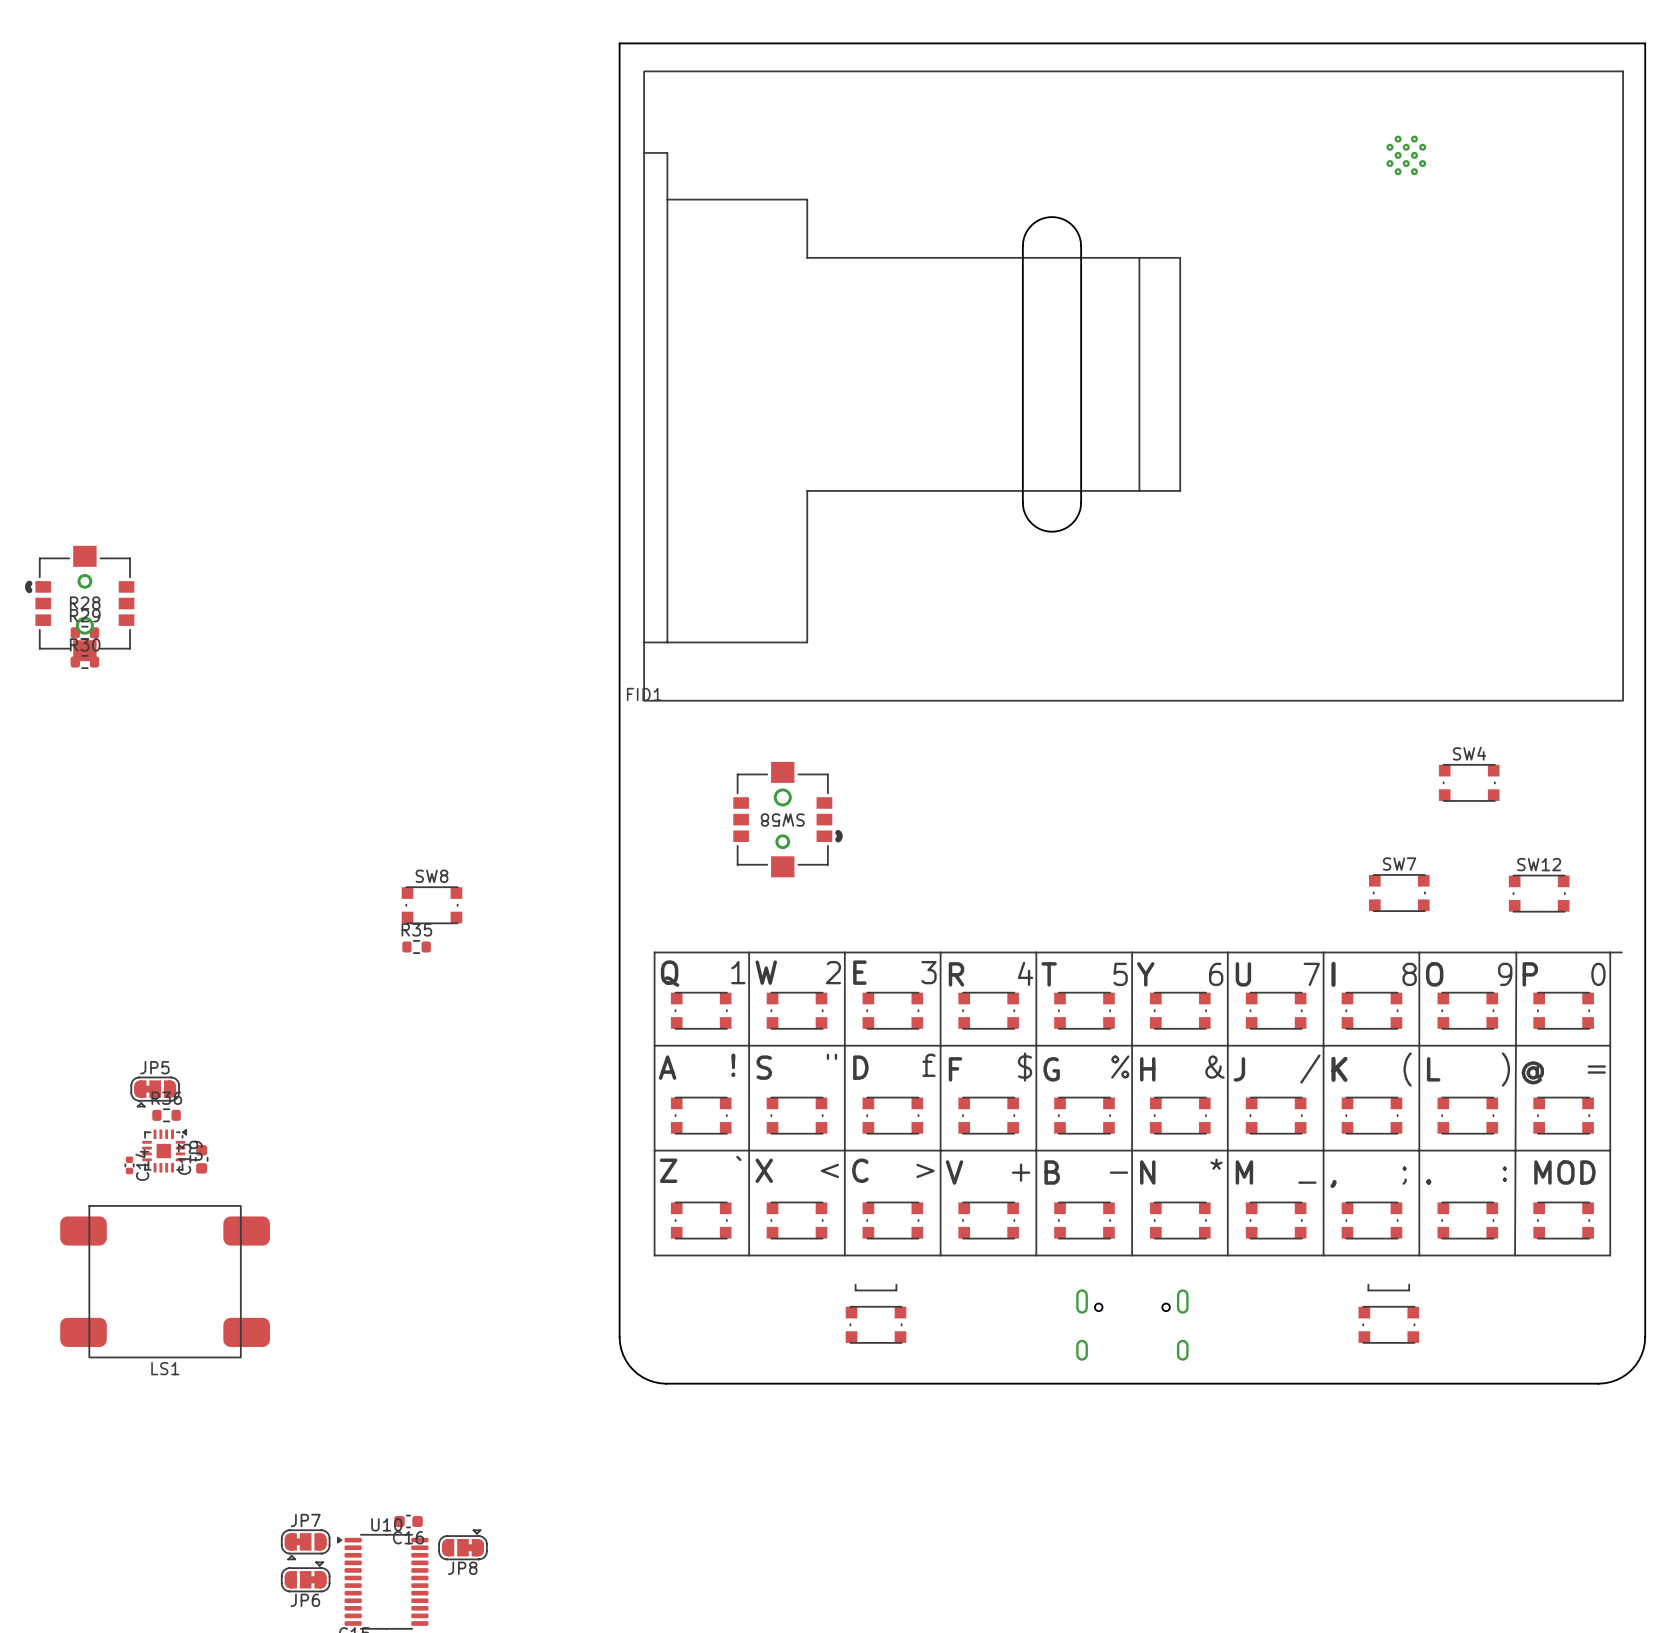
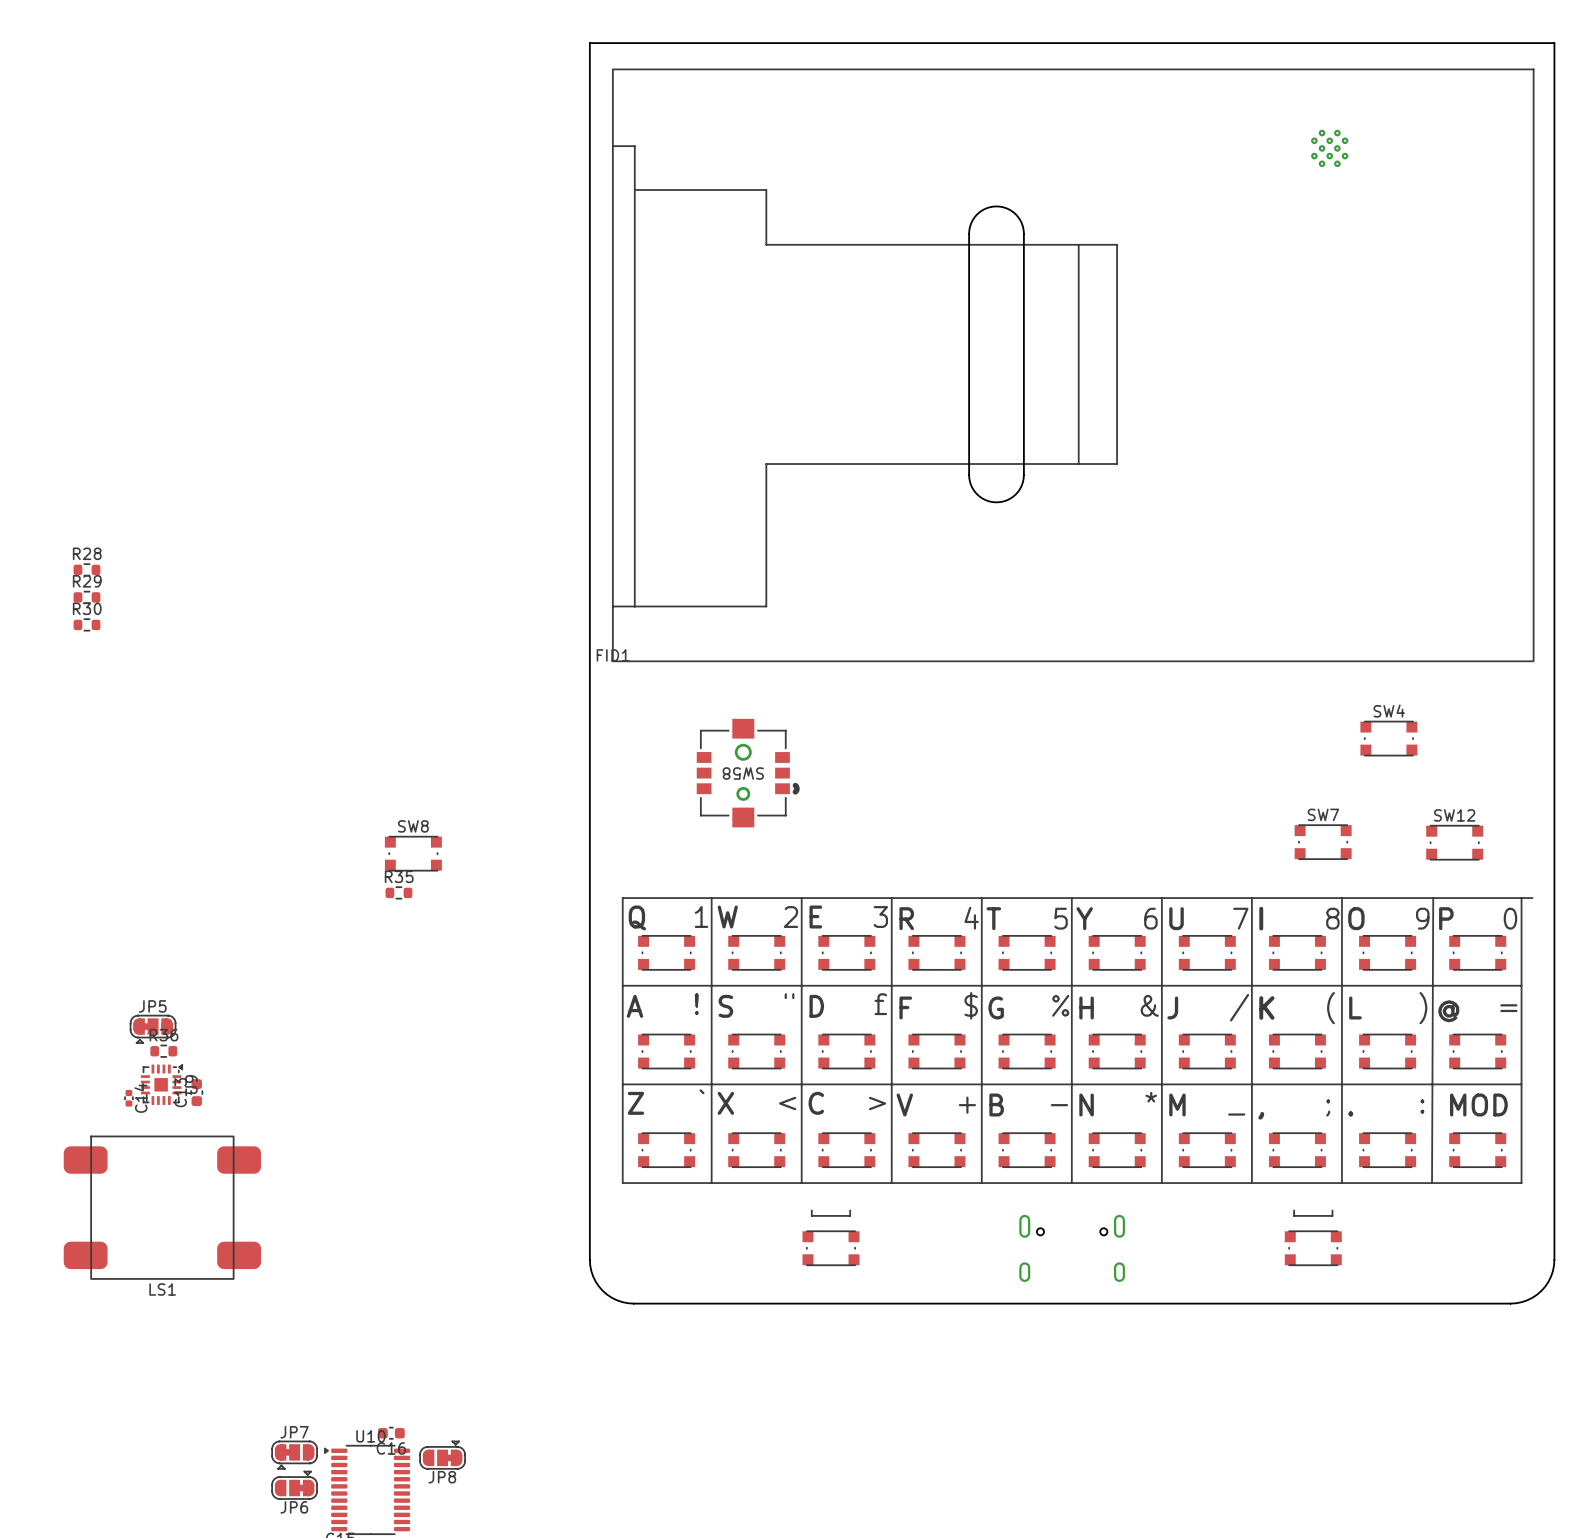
R28 footprint: [24, 545, 135, 662] -> [73, 563, 101, 577]

